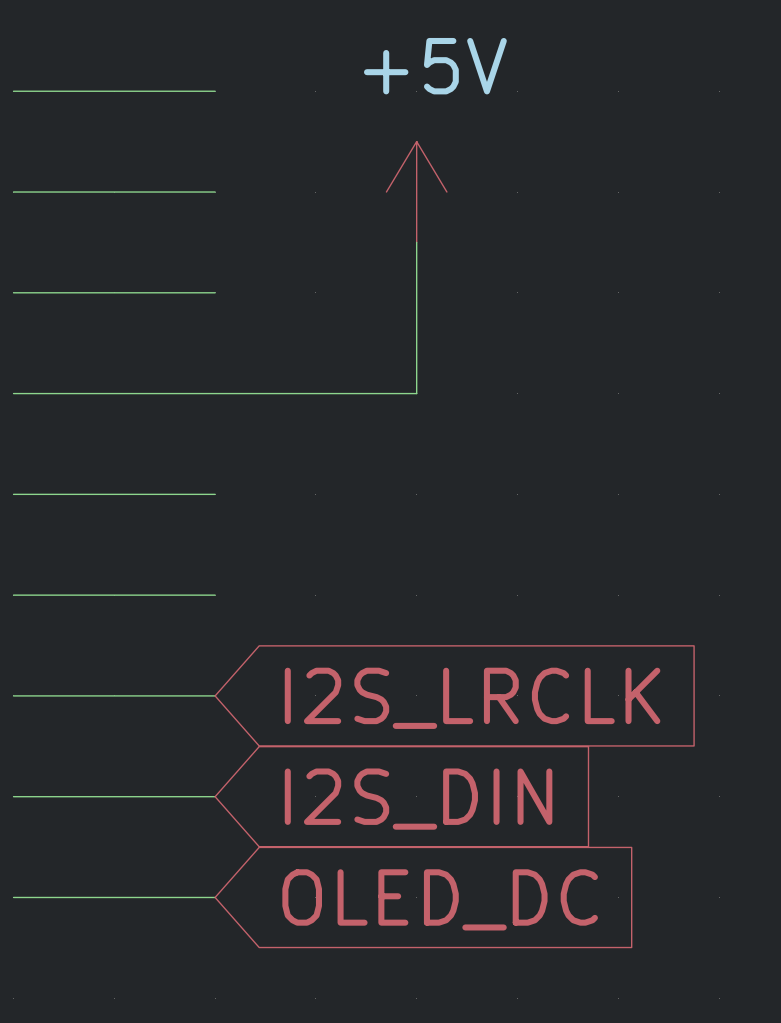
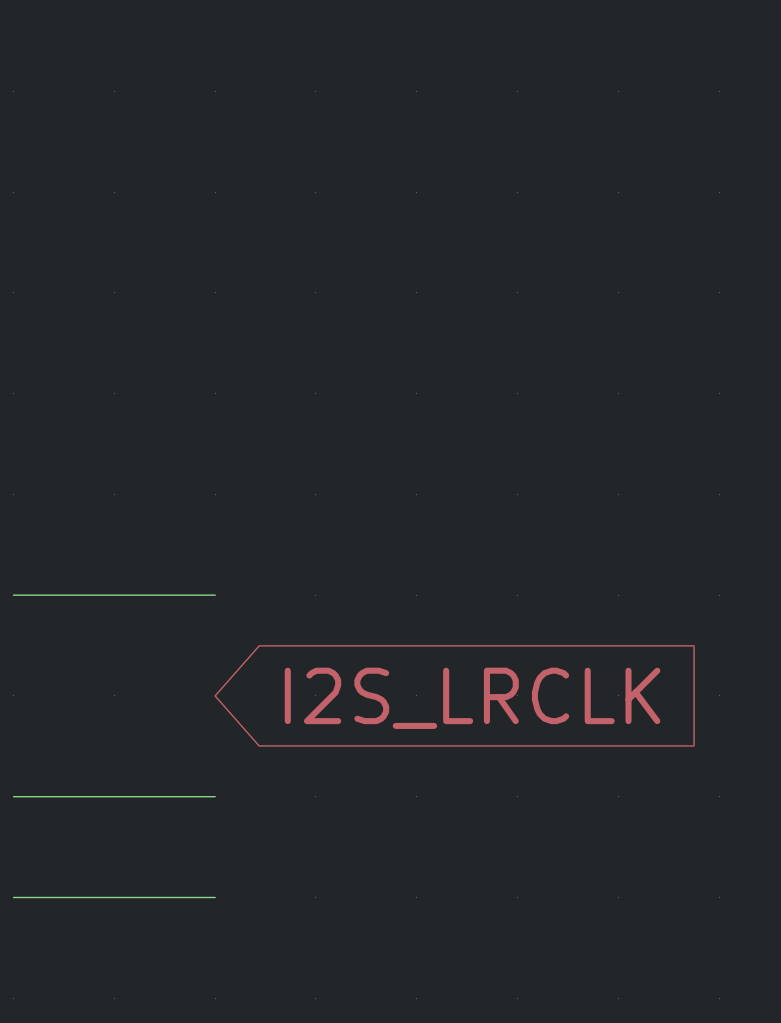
wire: (13, 91) (215, 91) -> none
wire: (13, 192) (215, 192) -> none
power symbol: +5V (416, 192) -> none
wire: (416, 242) (416, 393) (13, 393) -> none
wire: (13, 292) (215, 292) -> none
wire: (13, 494) (215, 494) -> none
wire: (13, 695) (215, 695) -> none
global label: I2S_DIN (418, 799) -> none
global label: OLED_DC (440, 899) -> none

